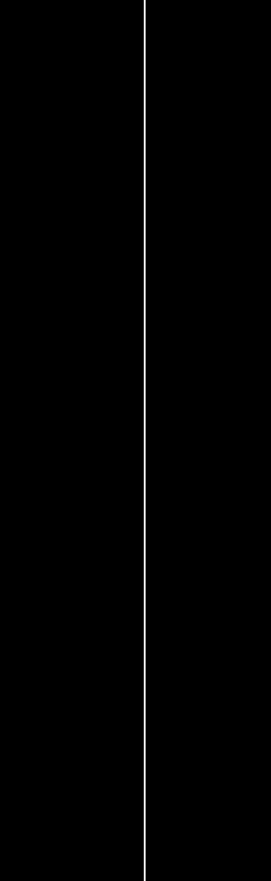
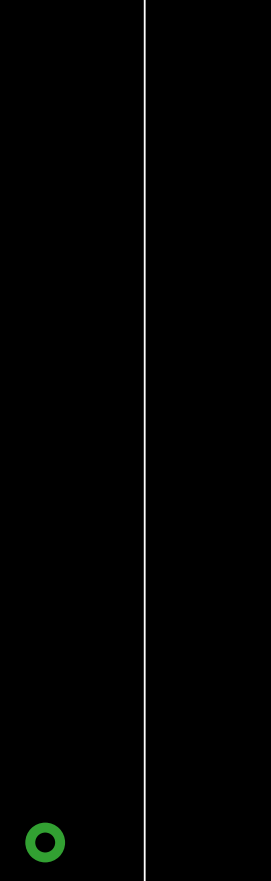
via: none -> (45, 842)

